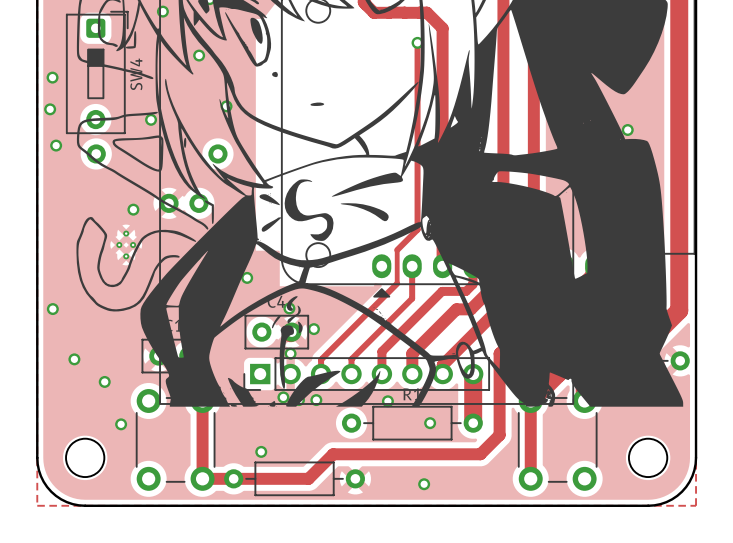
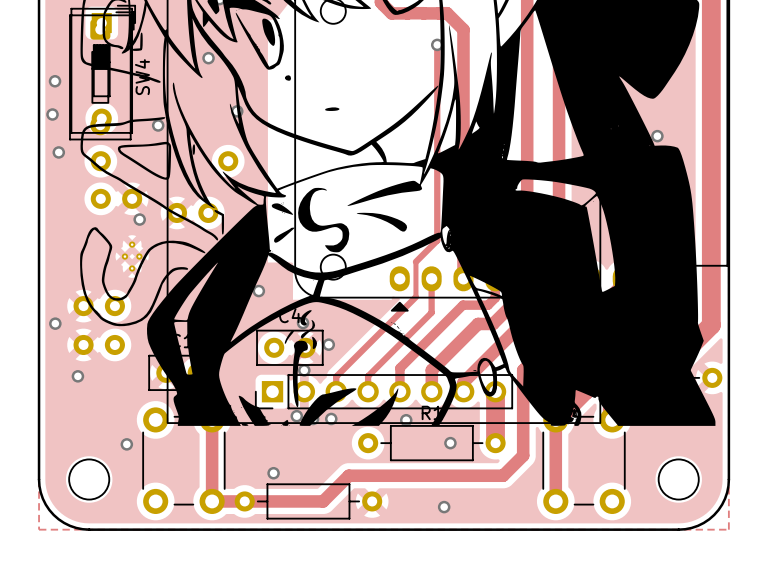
via: (162, 11) -> none
part: none -> (103, 69)
part: none -> (116, 198)
part: none -> (99, 306)
part: none -> (99, 344)
via: (104, 381) -> none

